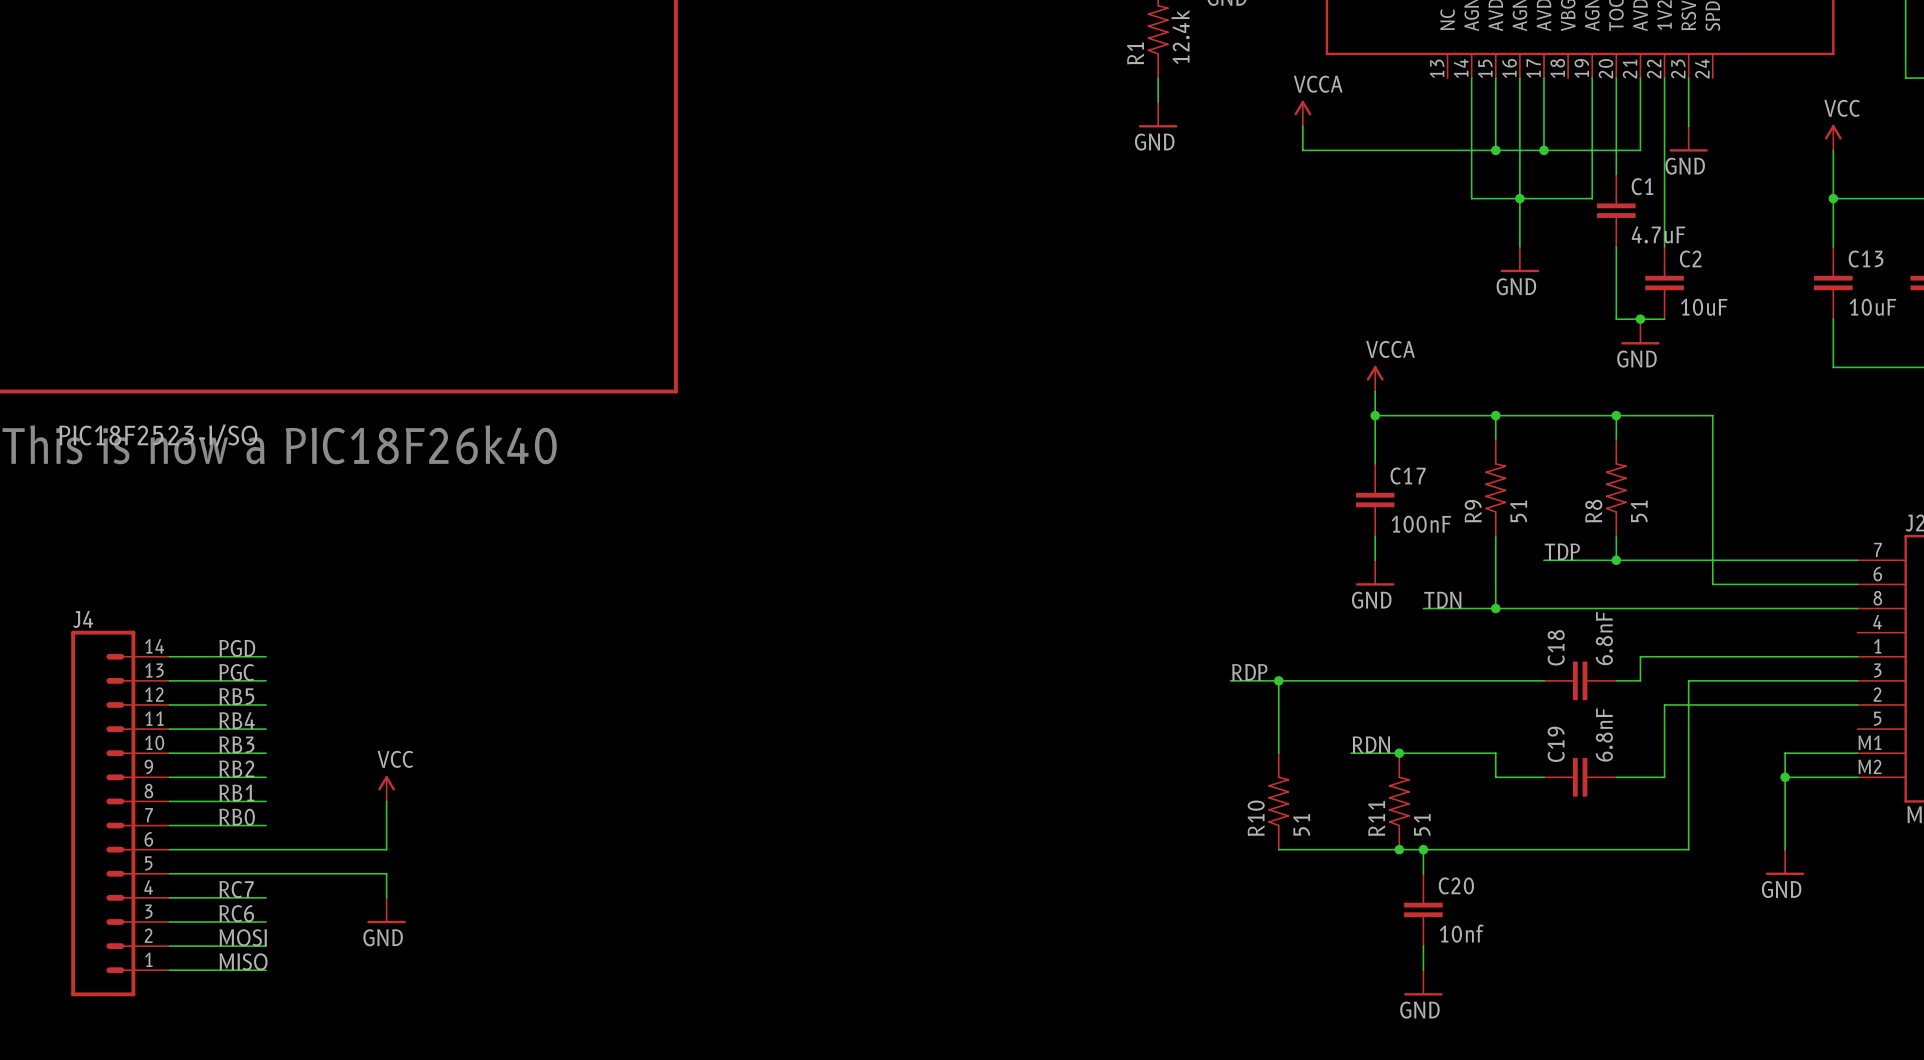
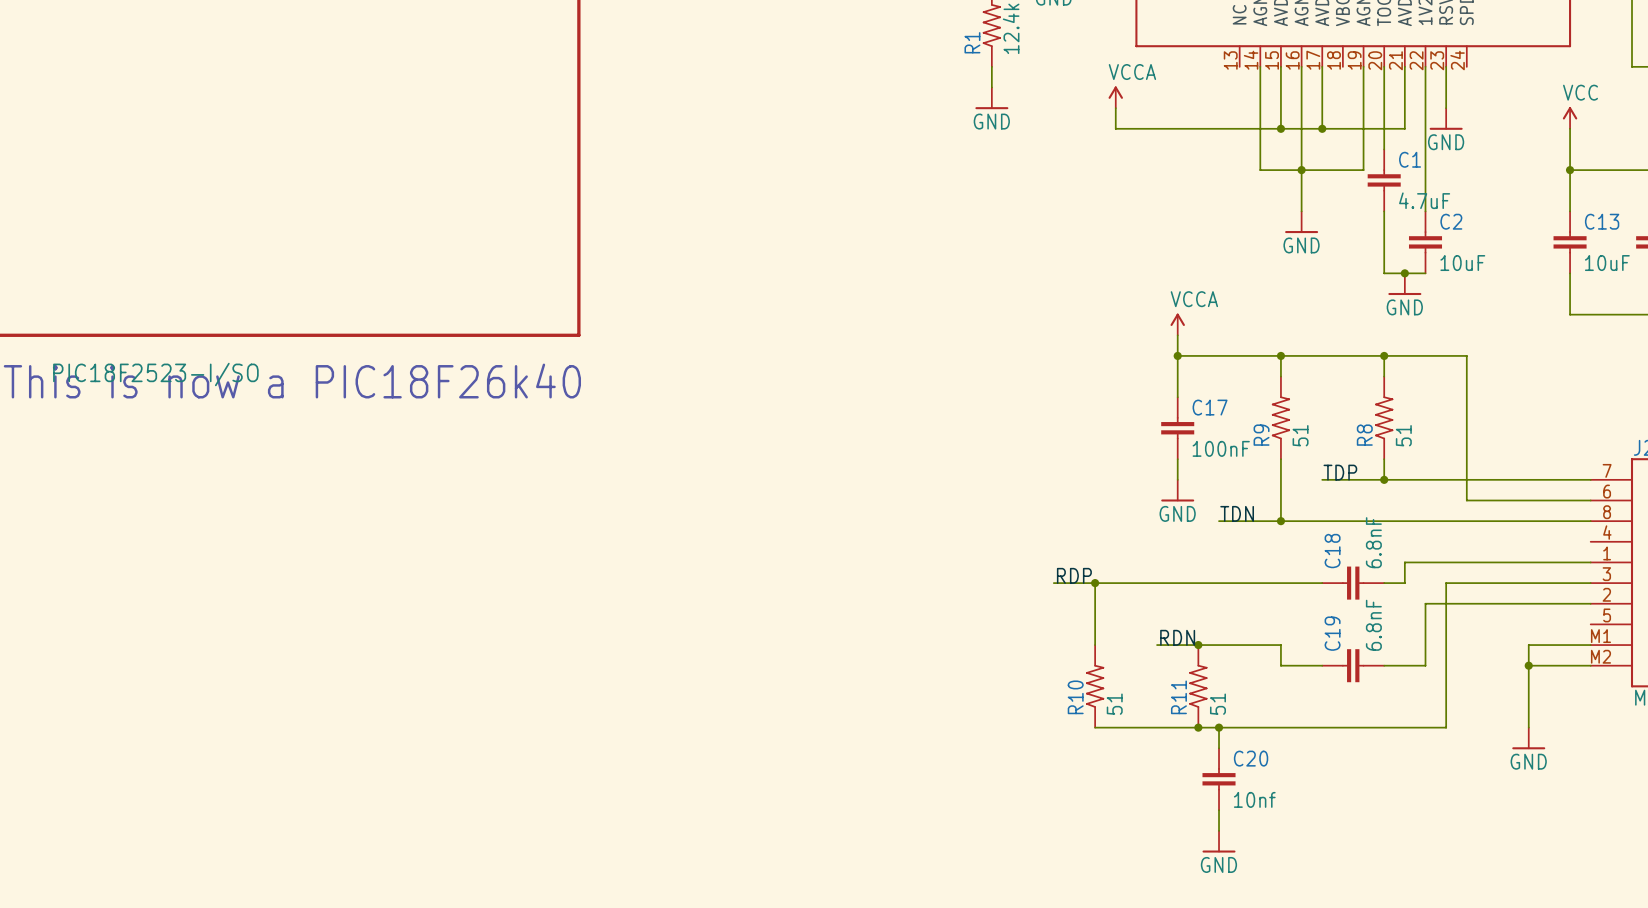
label: PGD (237, 648) -> none
wire: (169, 656) (266, 656) -> none
label: PGC (236, 672) -> none
wire: (169, 680) (266, 680) -> none
label: RB5 (236, 696) -> none
wire: (169, 704) (266, 704) -> none
label: RB4 (237, 720) -> none
wire: (169, 729) (266, 729) -> none
label: RB3 (236, 744) -> none
wire: (169, 753) (266, 753) -> none
label: RB2 (236, 768) -> none
wire: (169, 777) (266, 777) -> none
power symbol: VCC (386, 788) -> none
label: RB1 (236, 792) -> none
wire: (169, 801) (266, 801) -> none
wire: (386, 801) (386, 849) (169, 849) -> none
J4: (120, 813) -> none
label: RB0 (237, 817) -> none
wire: (169, 825) (266, 825) -> none
wire: (169, 873) (386, 873) (386, 897) -> none
label: RC7 (236, 889) -> none
wire: (169, 897) (266, 897) -> none
power symbol: GND (386, 910) -> none
label: RC6 (236, 913) -> none
wire: (169, 921) (266, 921) -> none
label: MOSI (243, 937) -> none
wire: (169, 946) (266, 946) -> none
label: MISO (243, 961) -> none
wire: (169, 970) (266, 970) -> none

